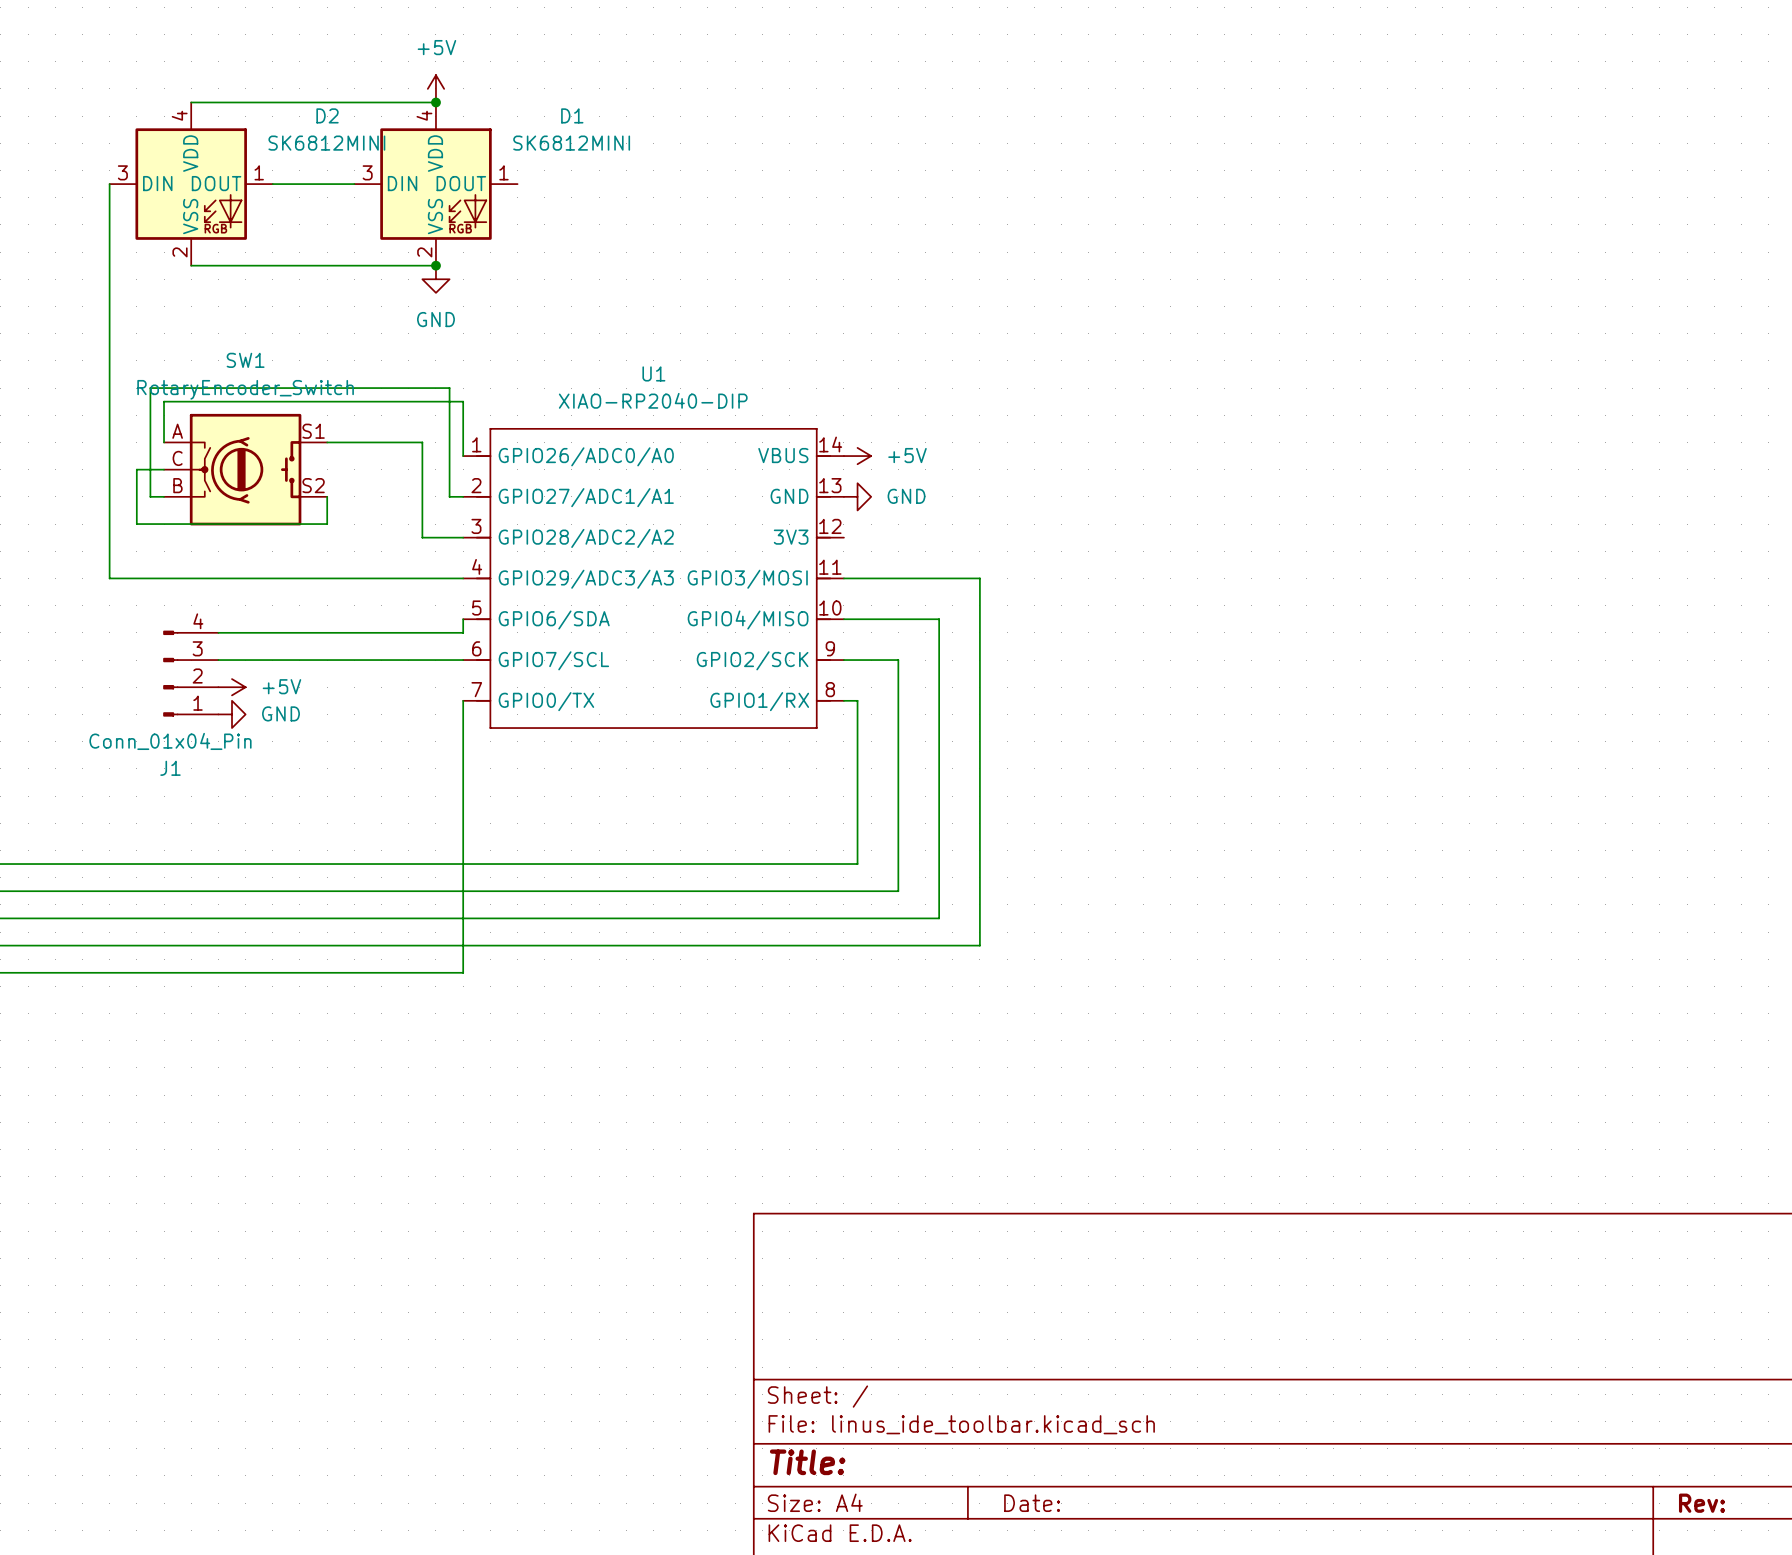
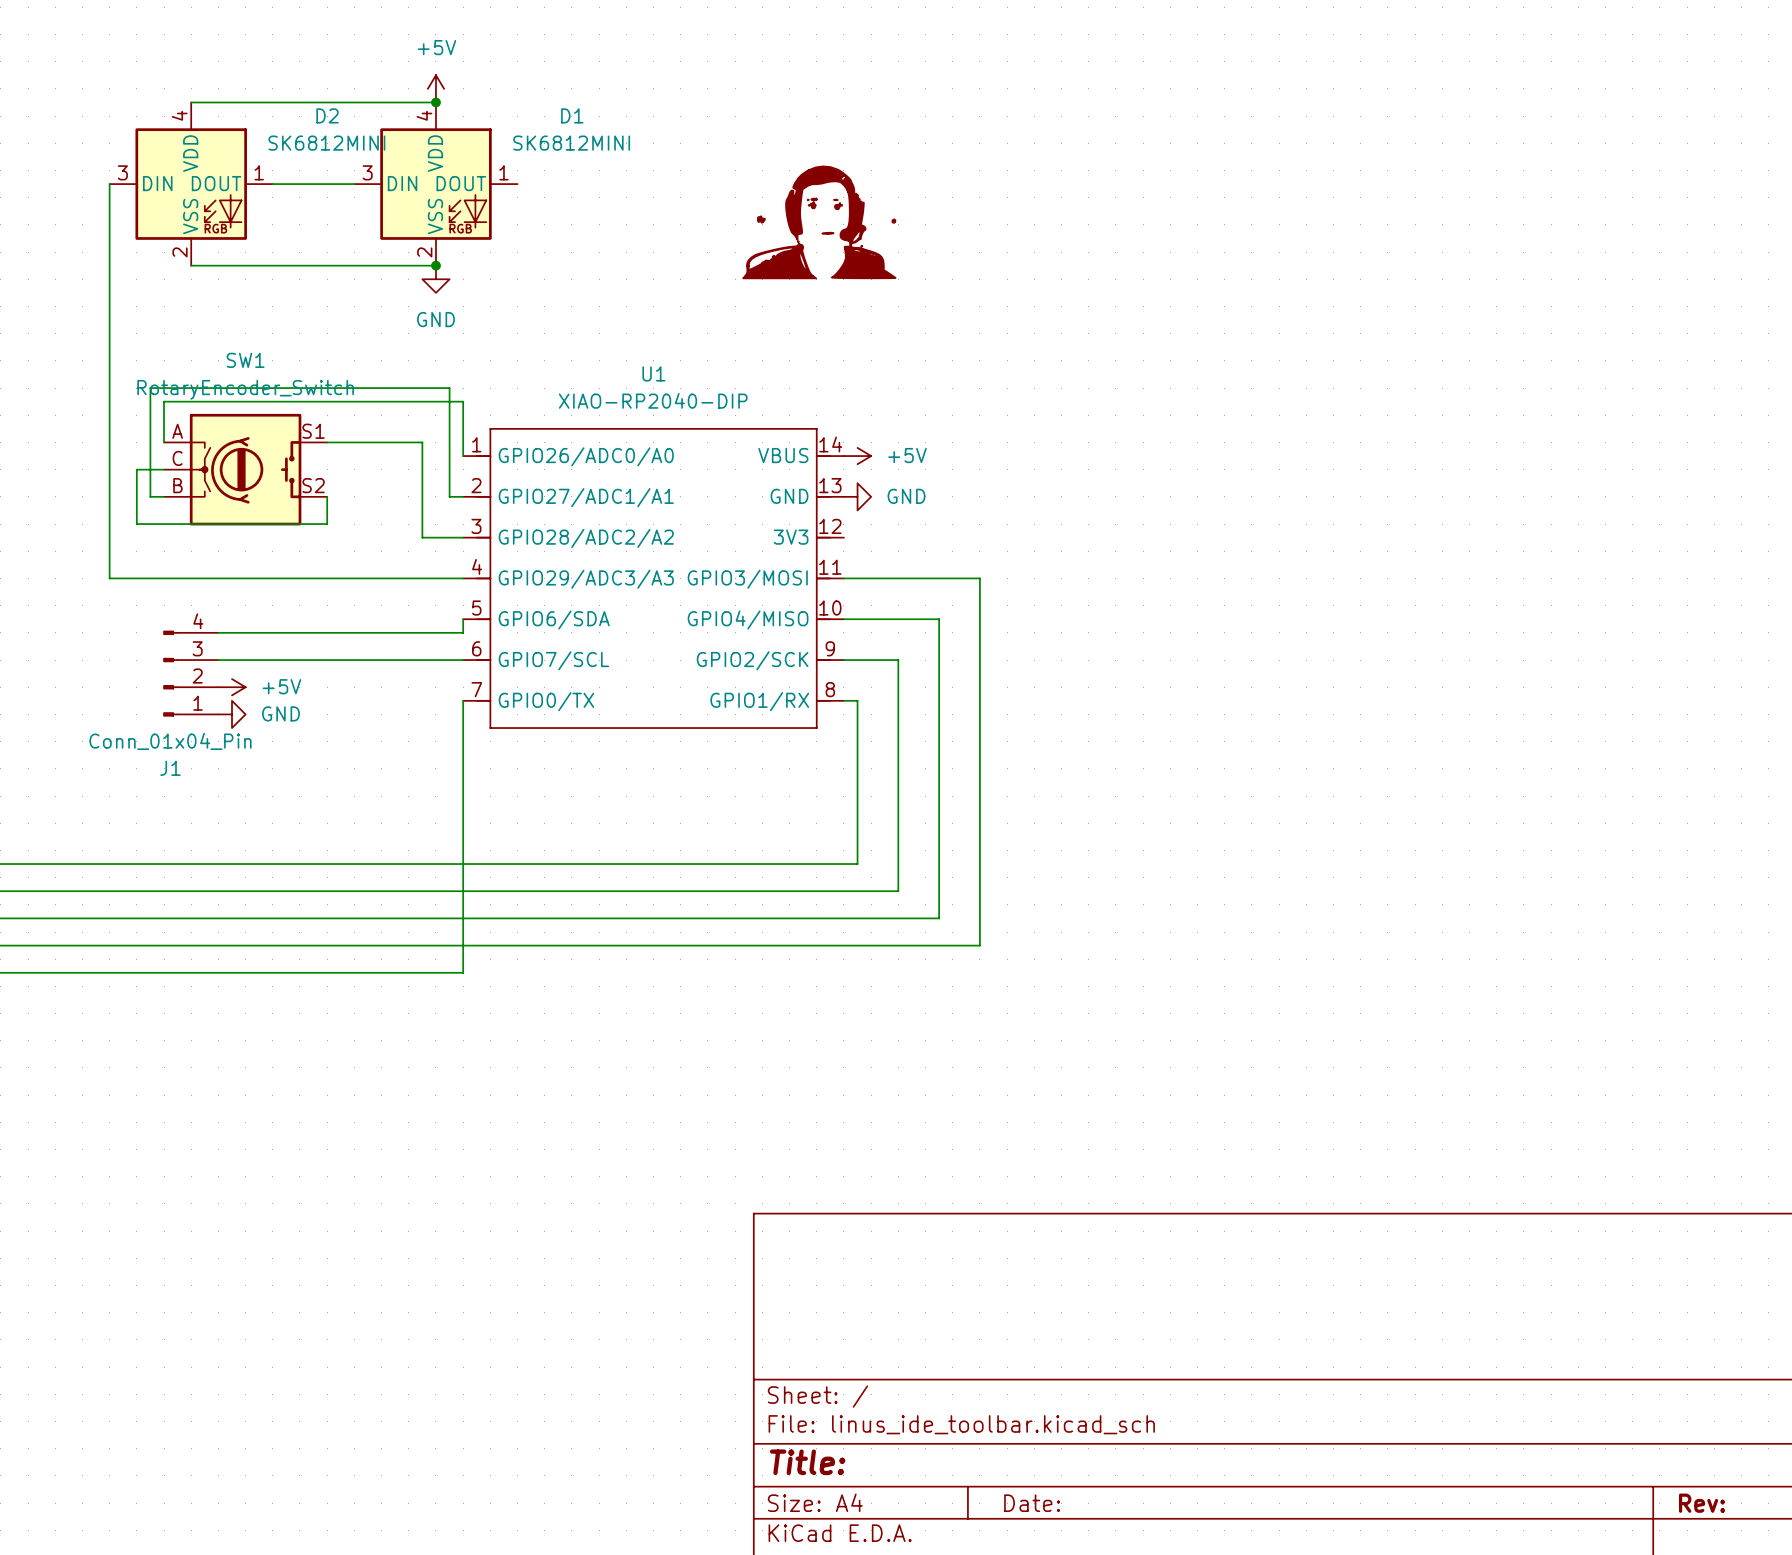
power symbol: none -> (819, 222)

